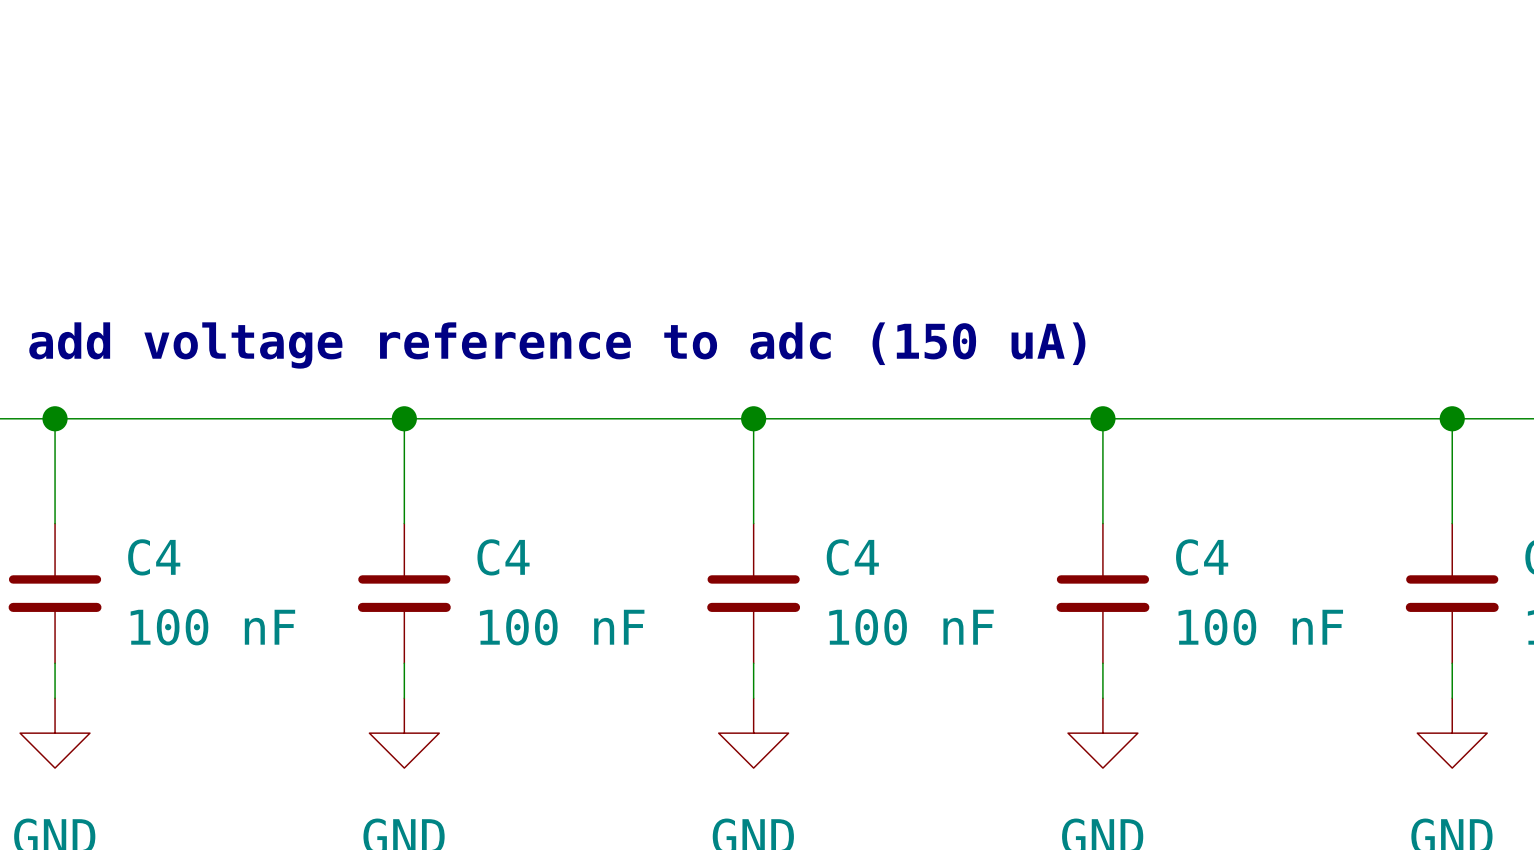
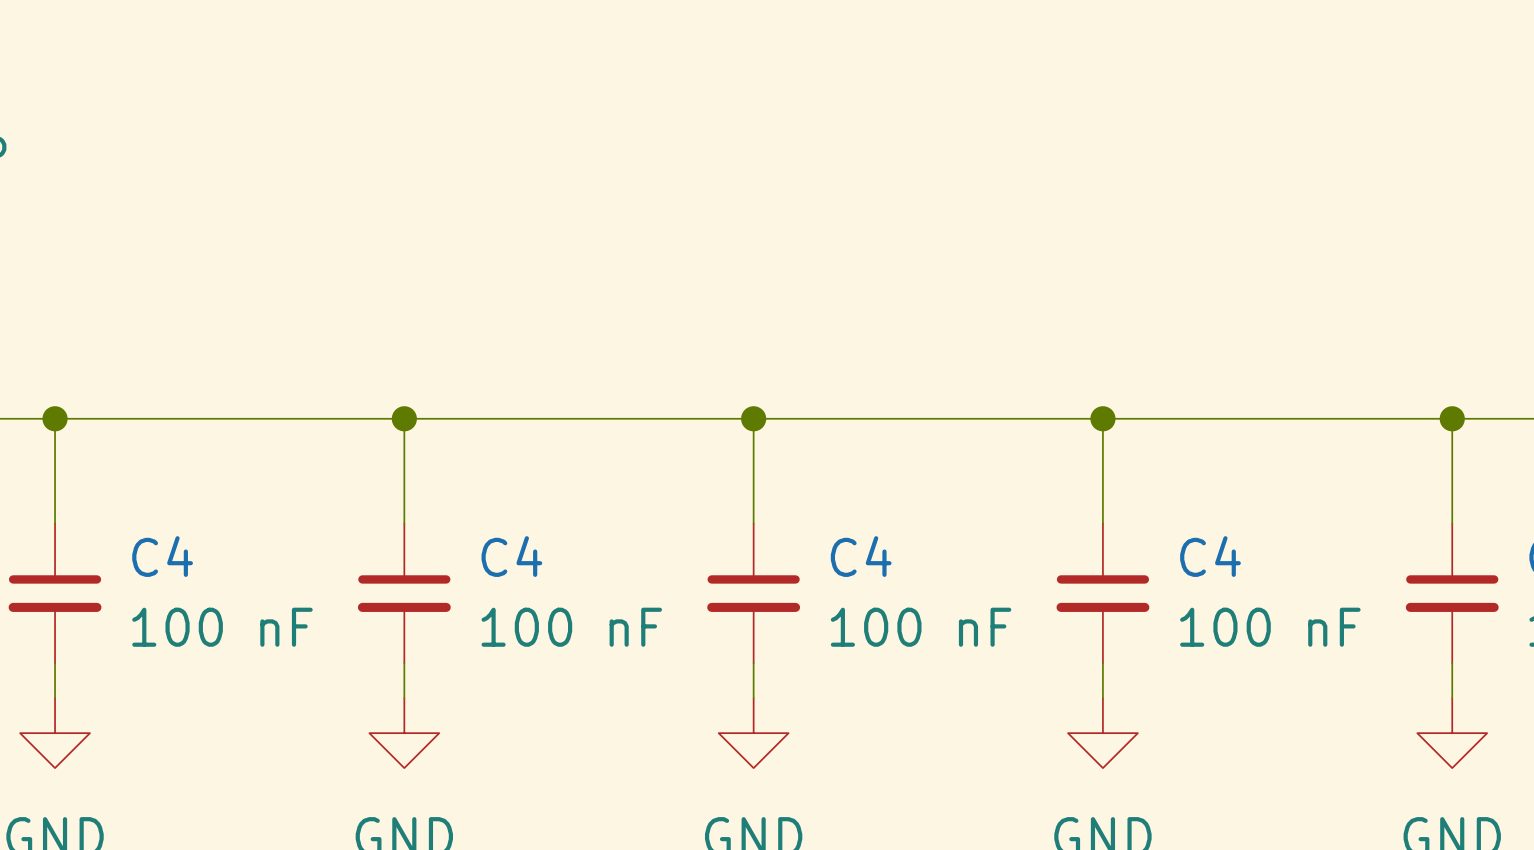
text: add voltage reference to adc (150 uA) (557, 345) -> none

